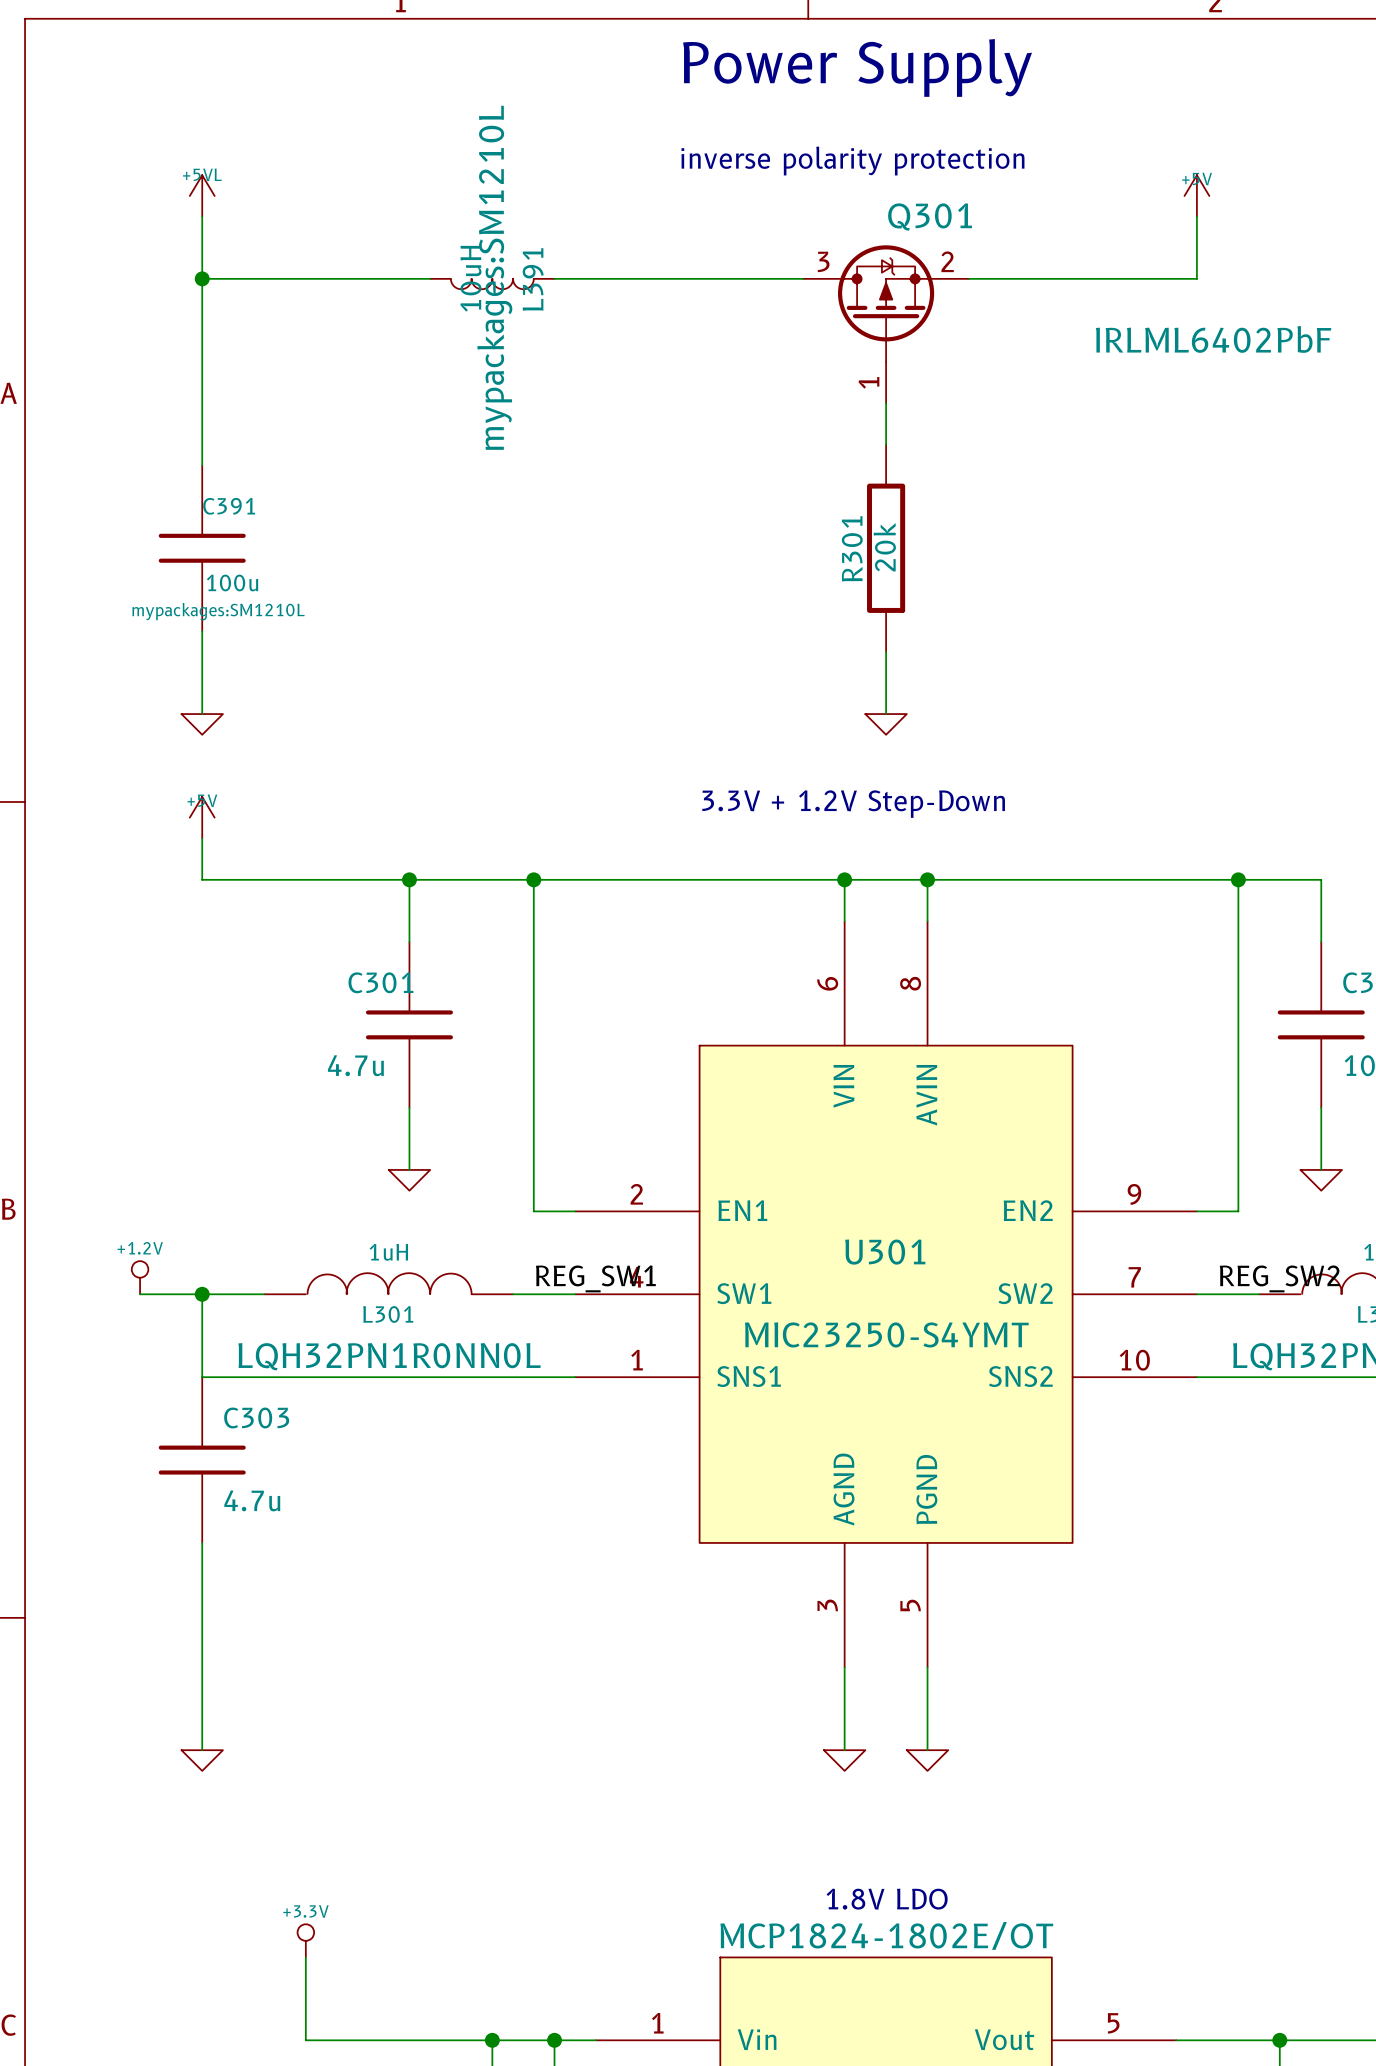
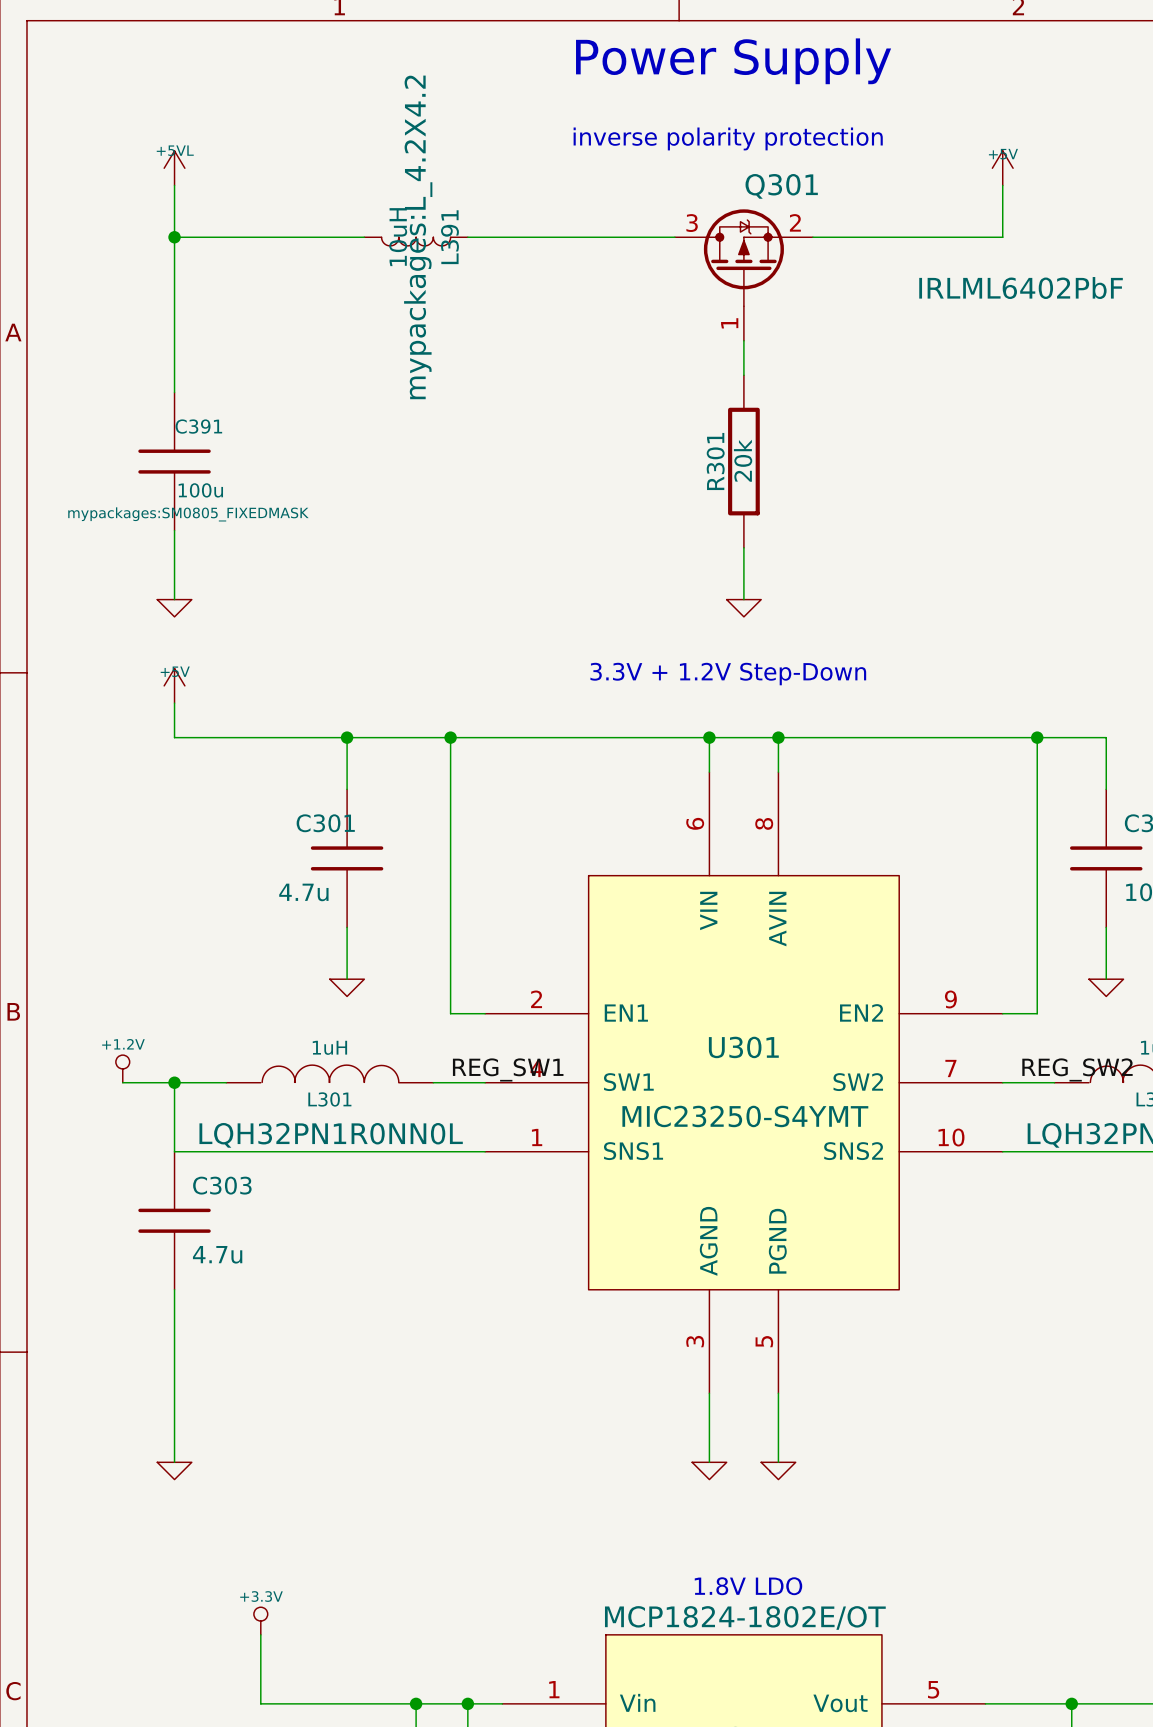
L391 text: mypackages:SM1210L (494, 277) -> mypackages:L_4.2X4.2 (418, 237)
C391 text: mypackages:SM1210L (218, 611) -> mypackages:SM0805_FIXEDMASK (188, 514)

